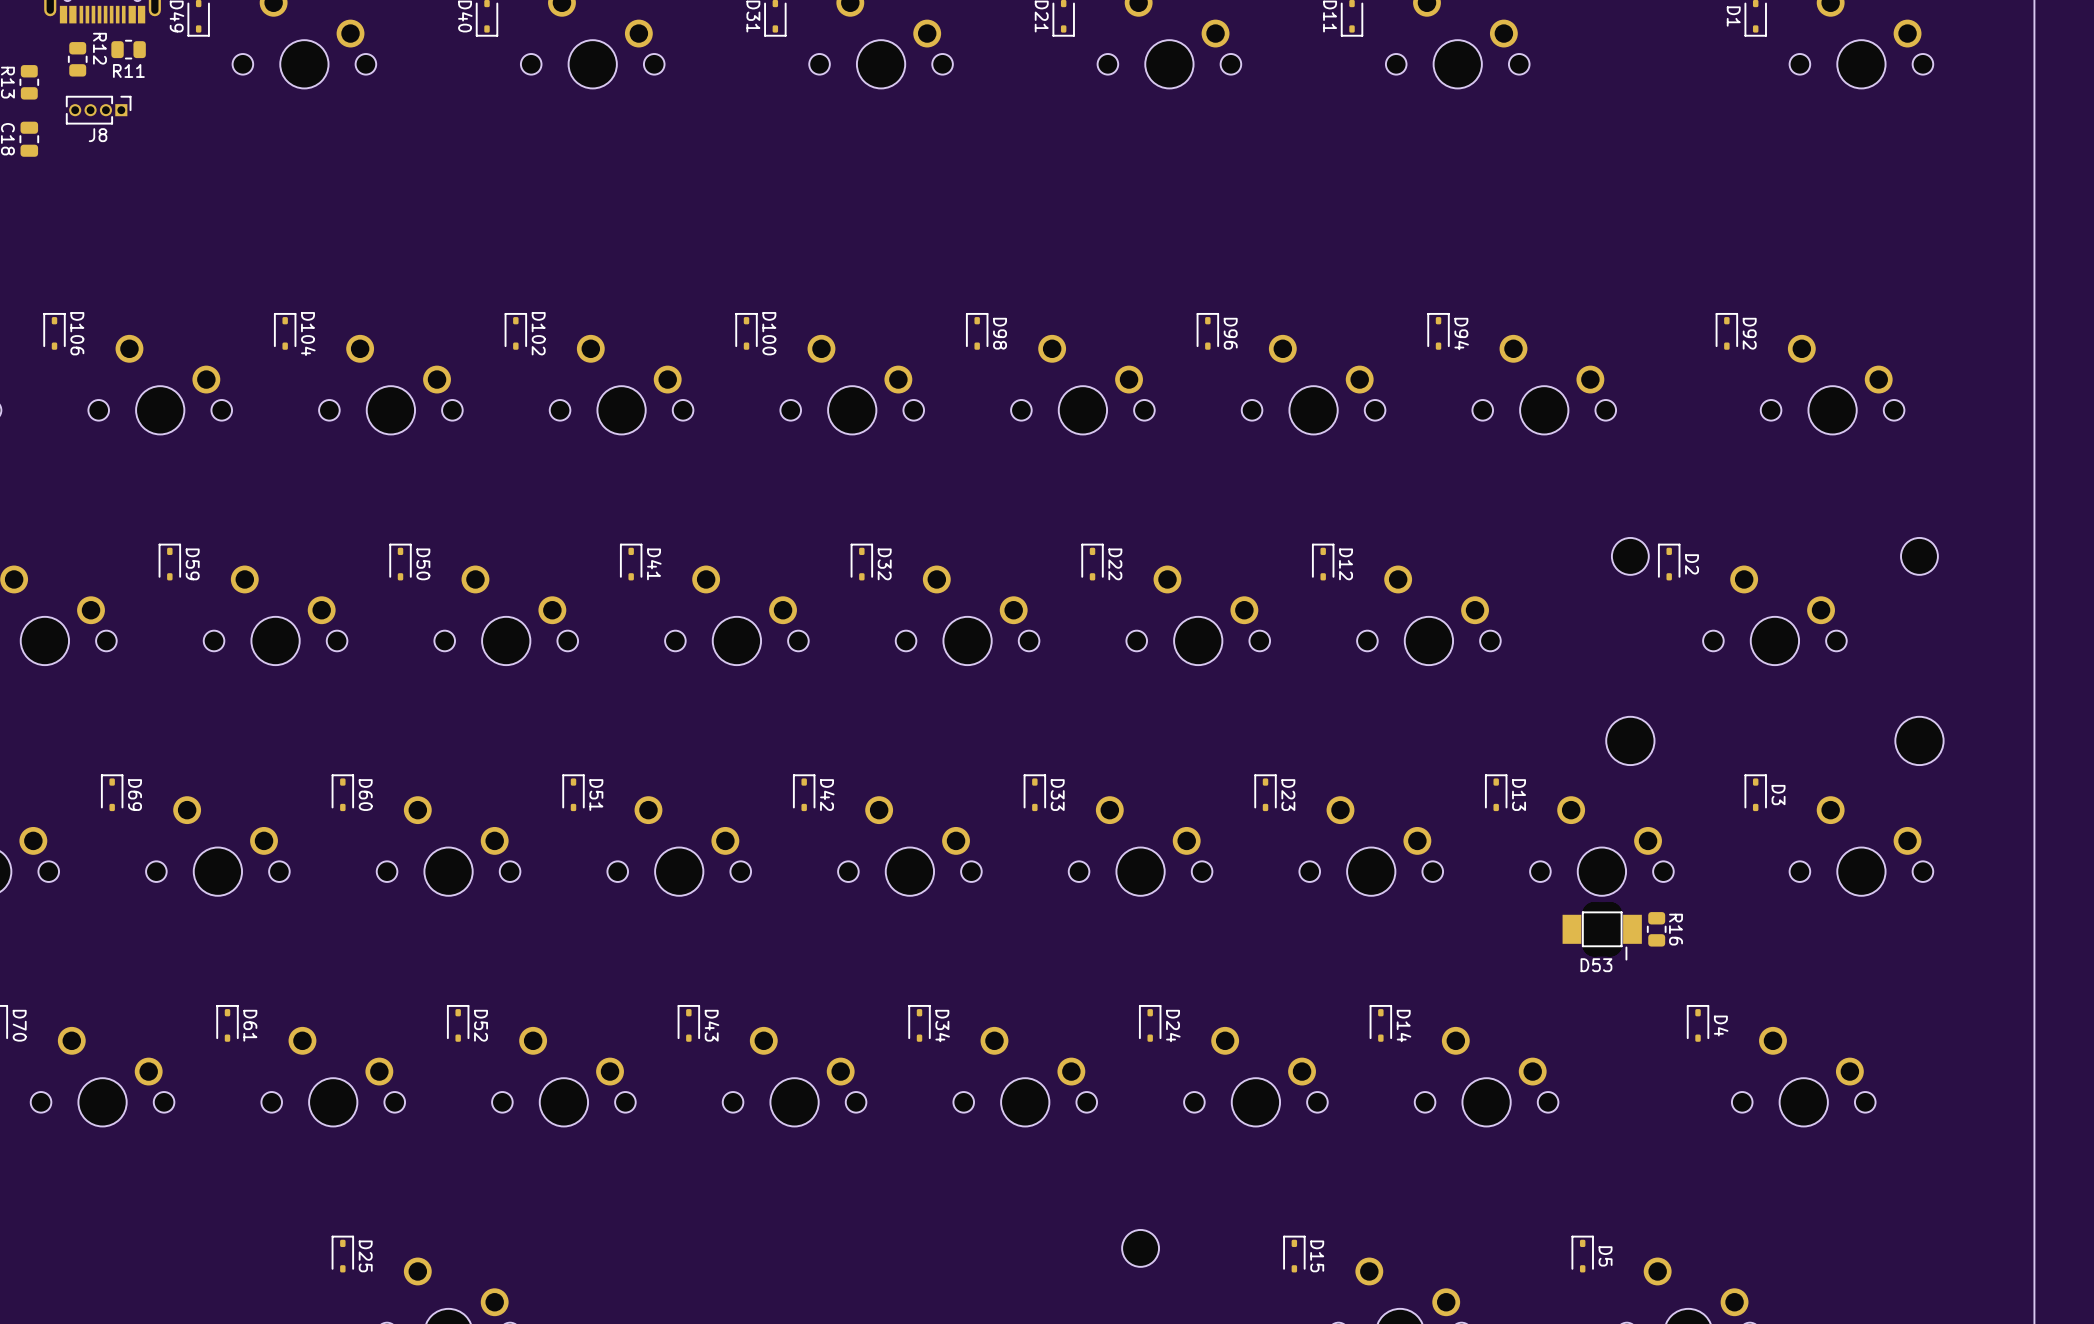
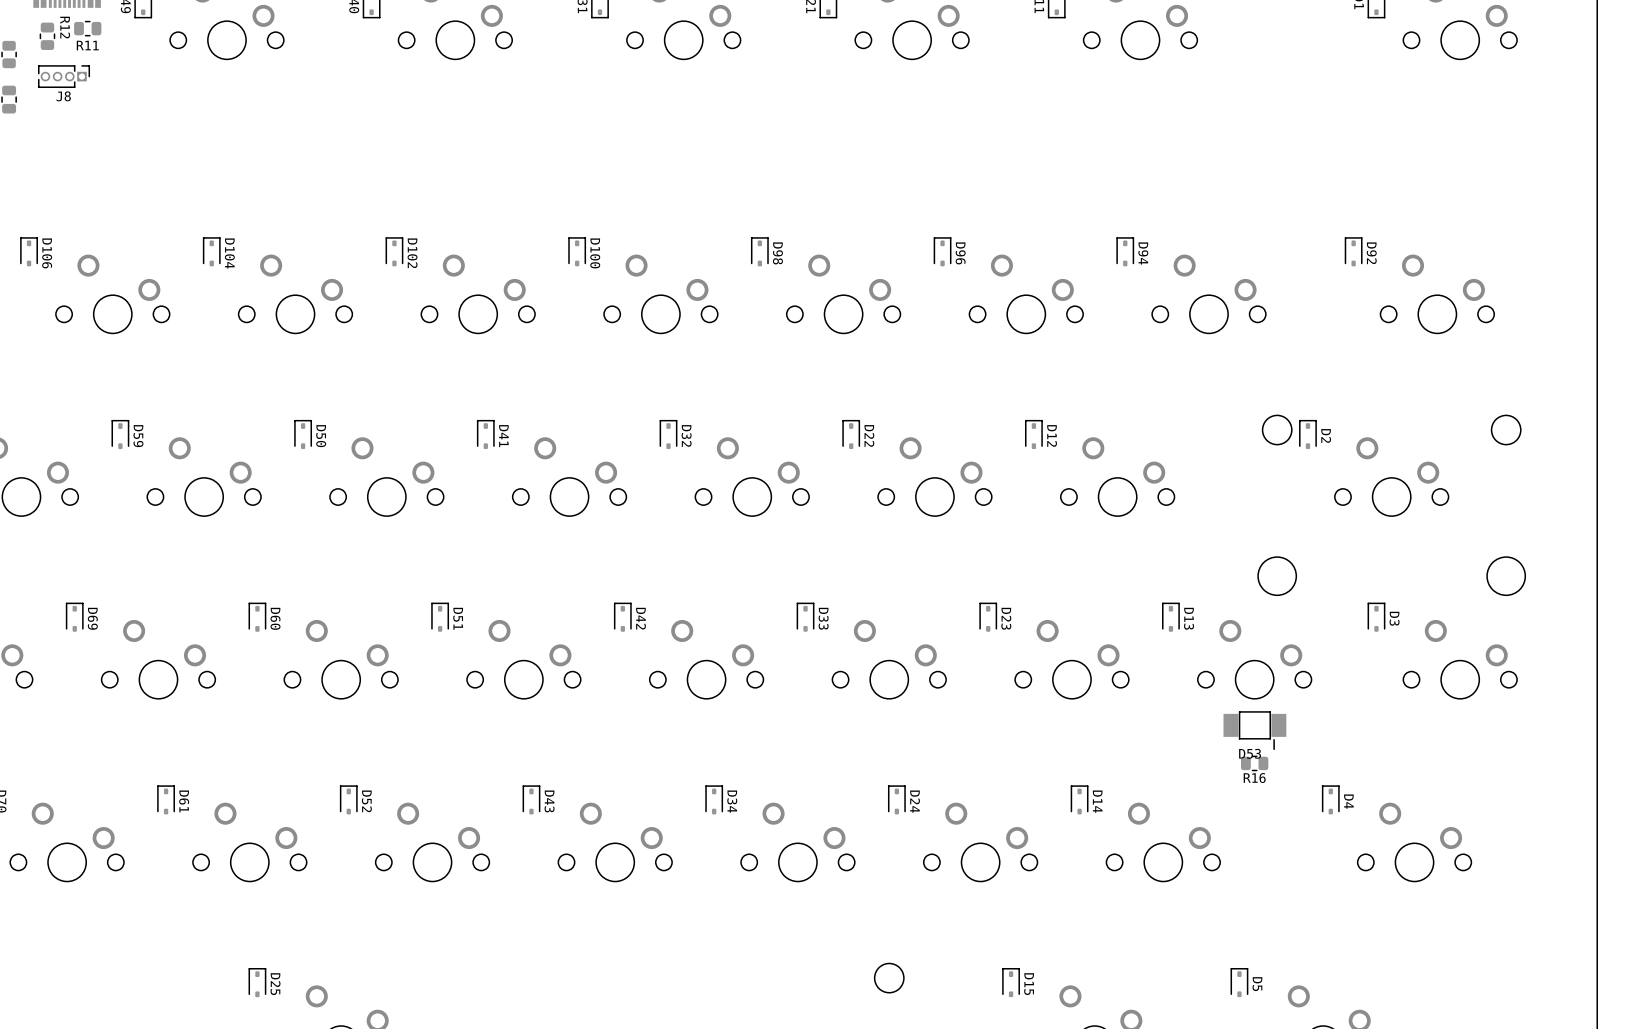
R16 rotation: 0° (1656, 929) -> 90° clockwise (1254, 763)
R16 position: (1656, 929) -> (1254, 763)

